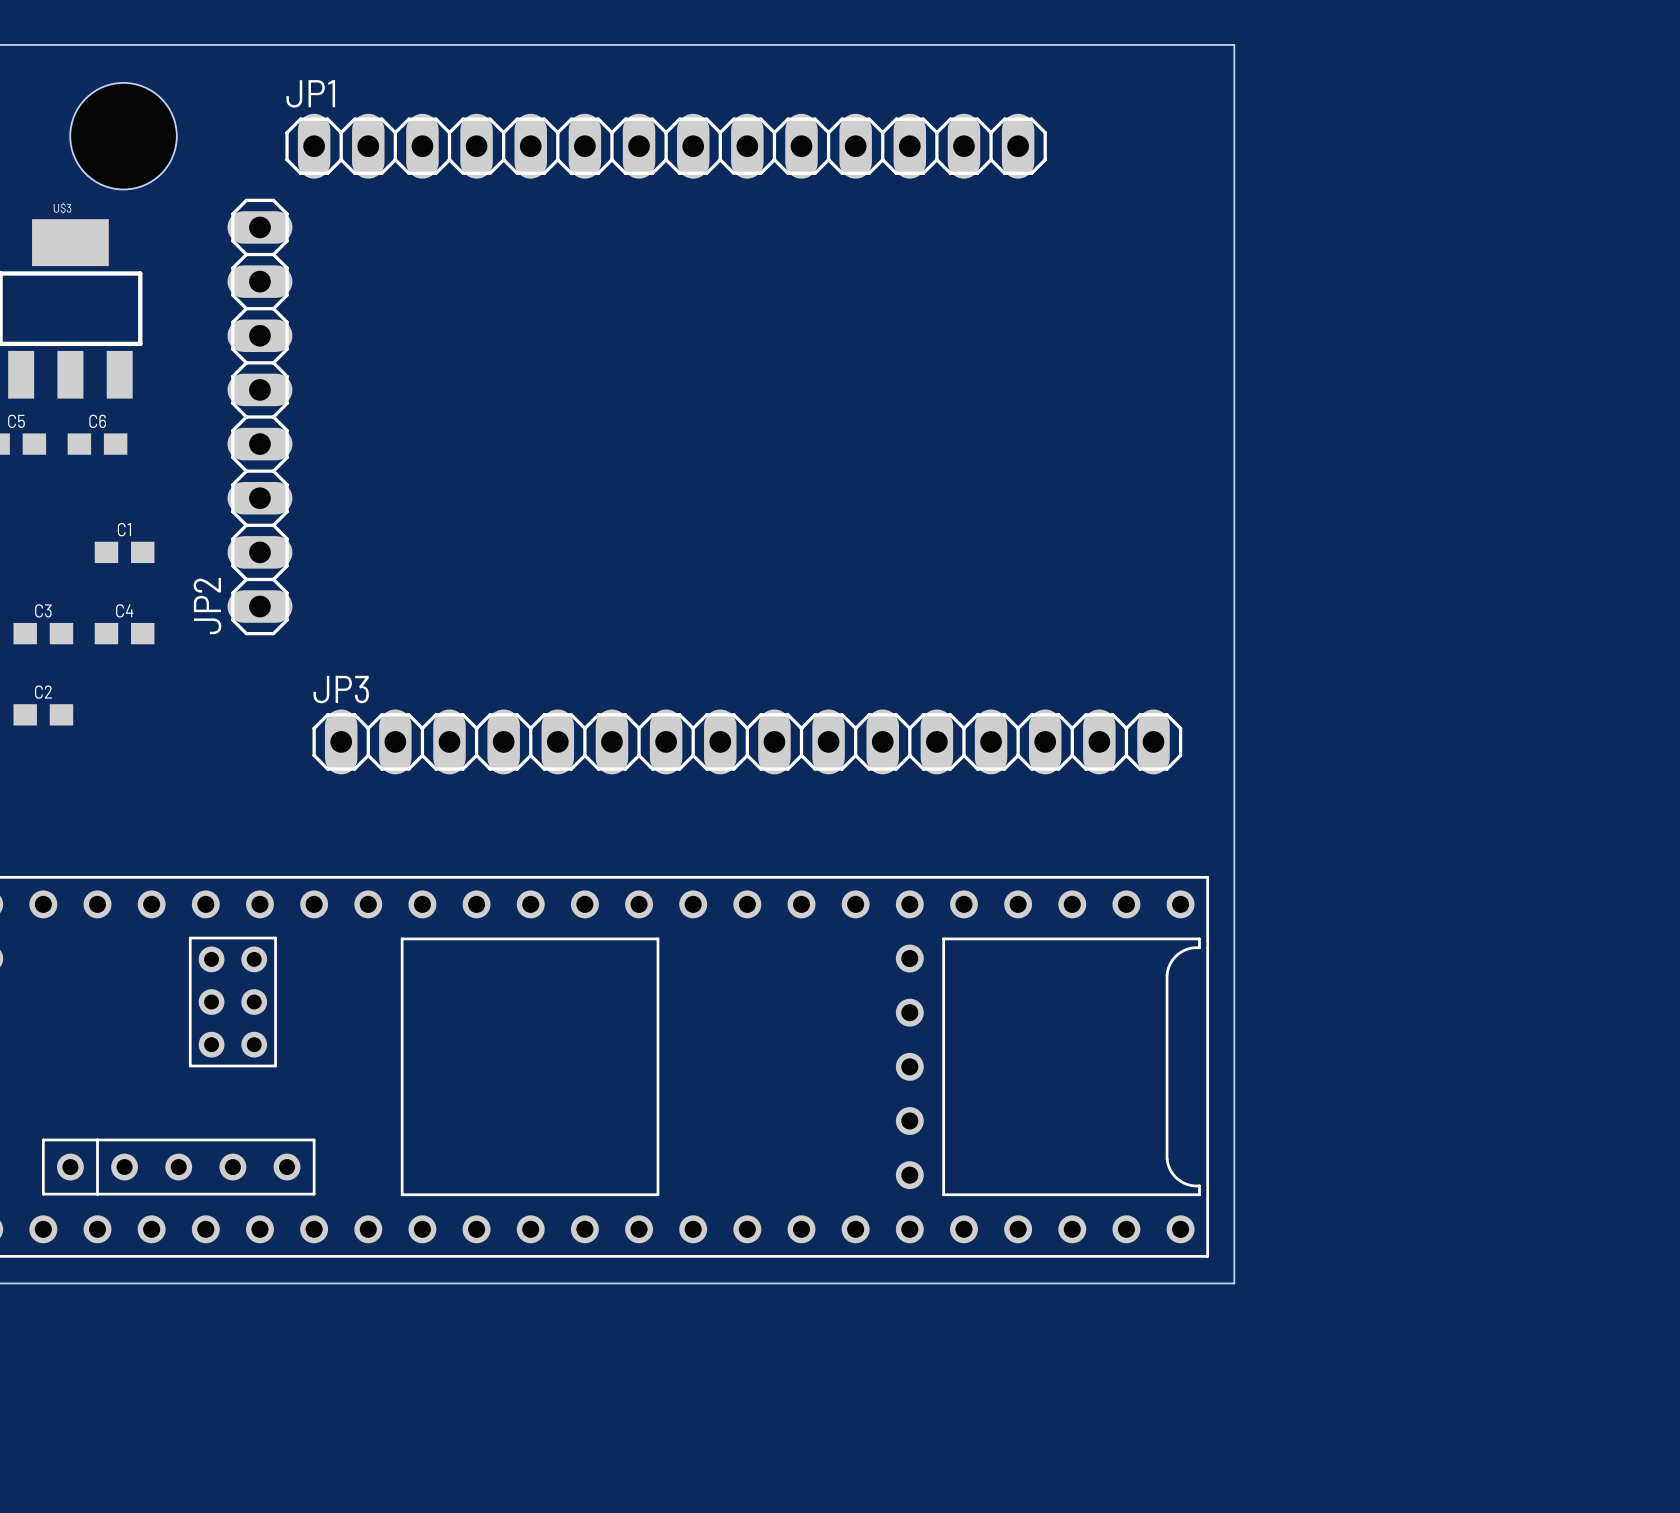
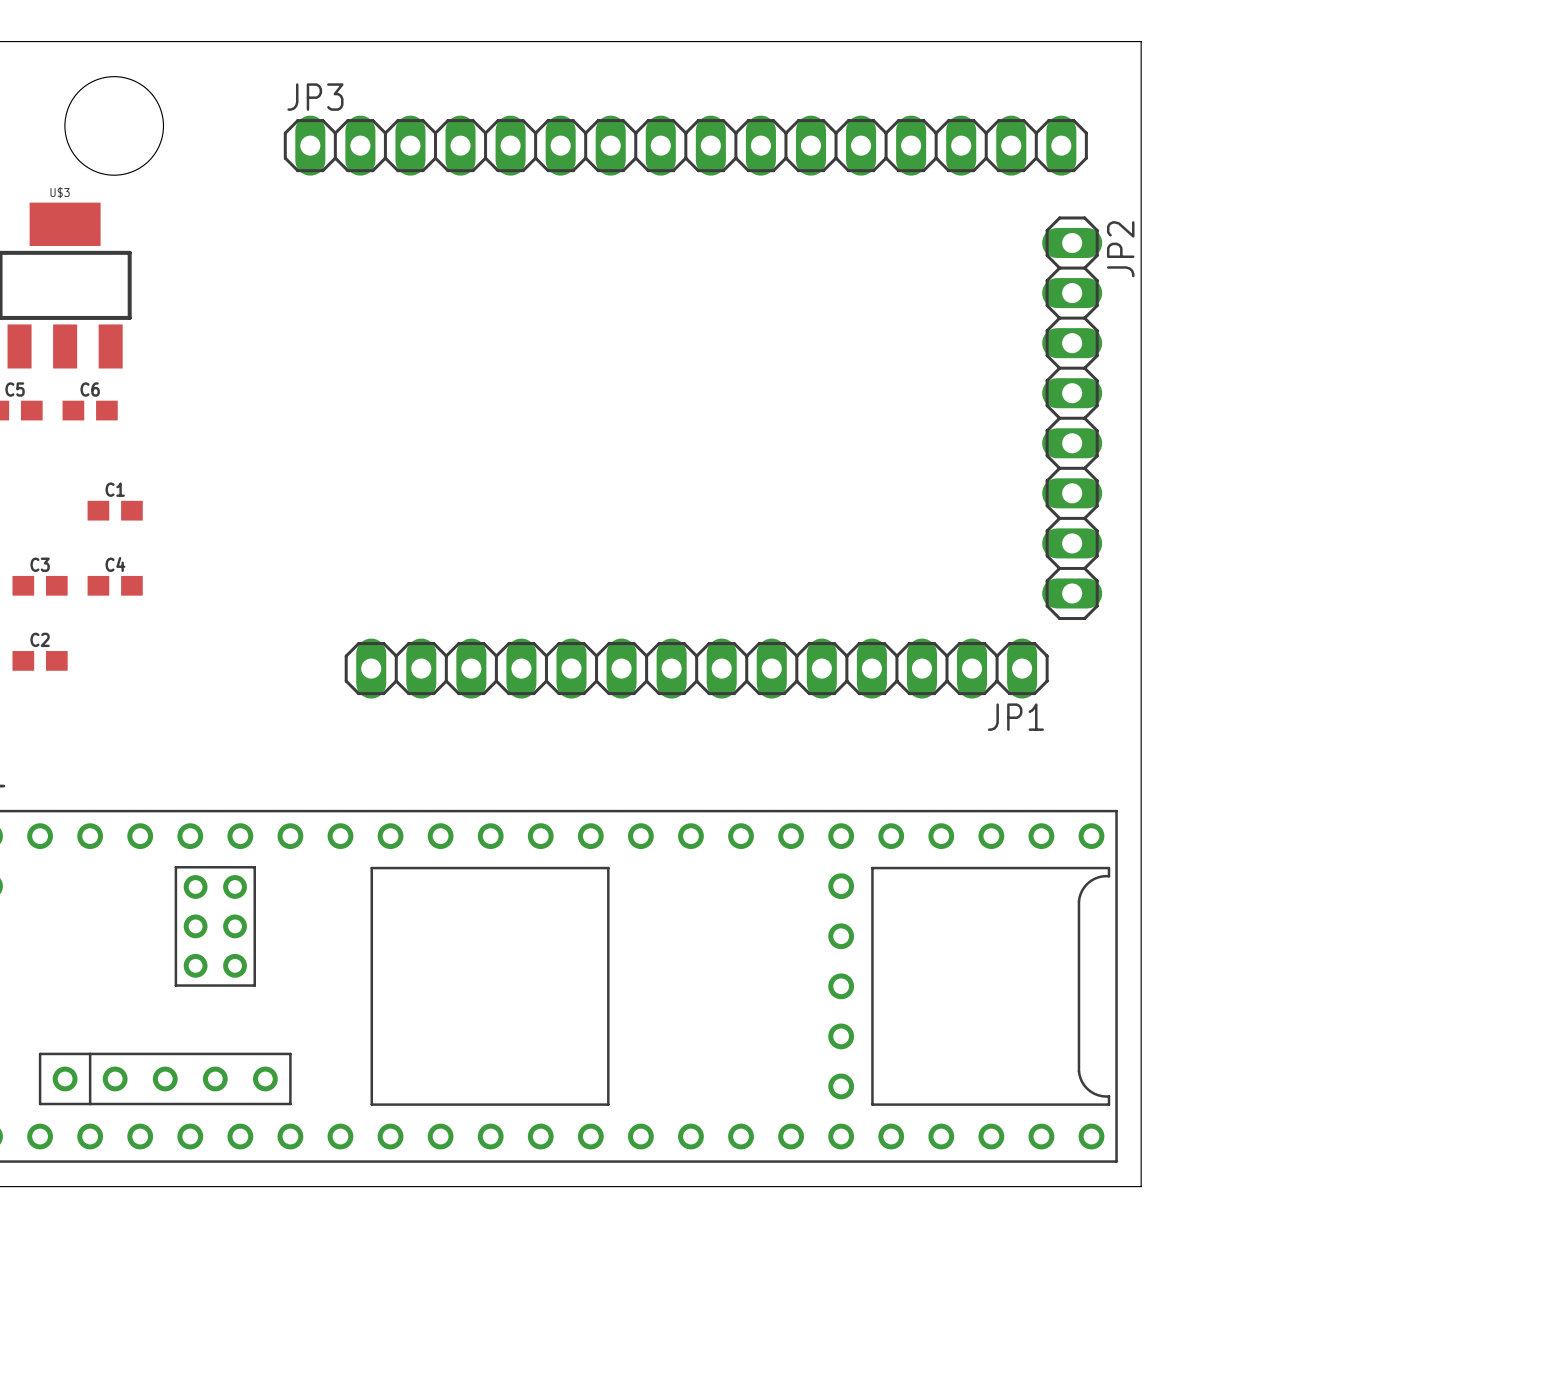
JP1 name position: JP1 (310, 93) -> JP1 (1015, 717)
JP1 position: (666, 146) -> (696, 668)
JP2 position: (259, 416) -> (1072, 418)
JP2 name position: JP2 (207, 606) -> JP2 (1120, 249)
JP3 position: (747, 741) -> (685, 145)

